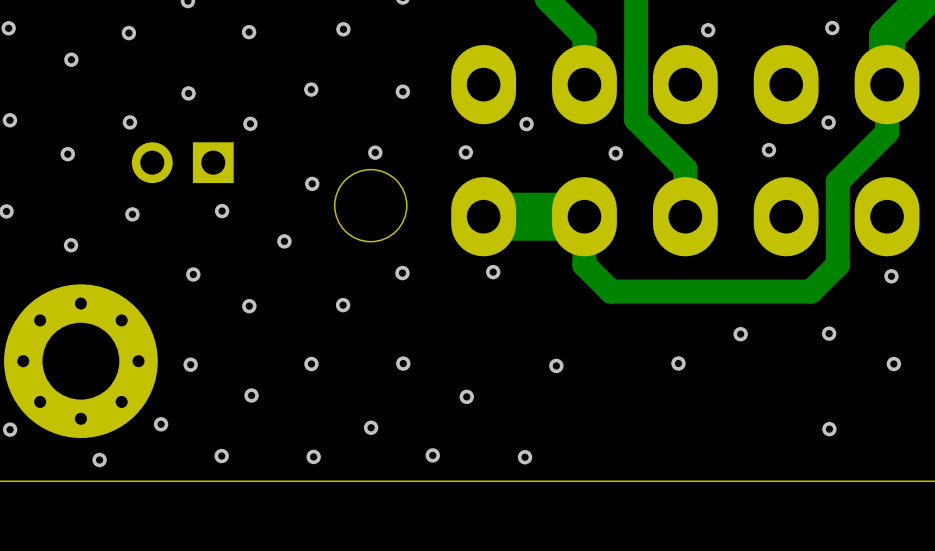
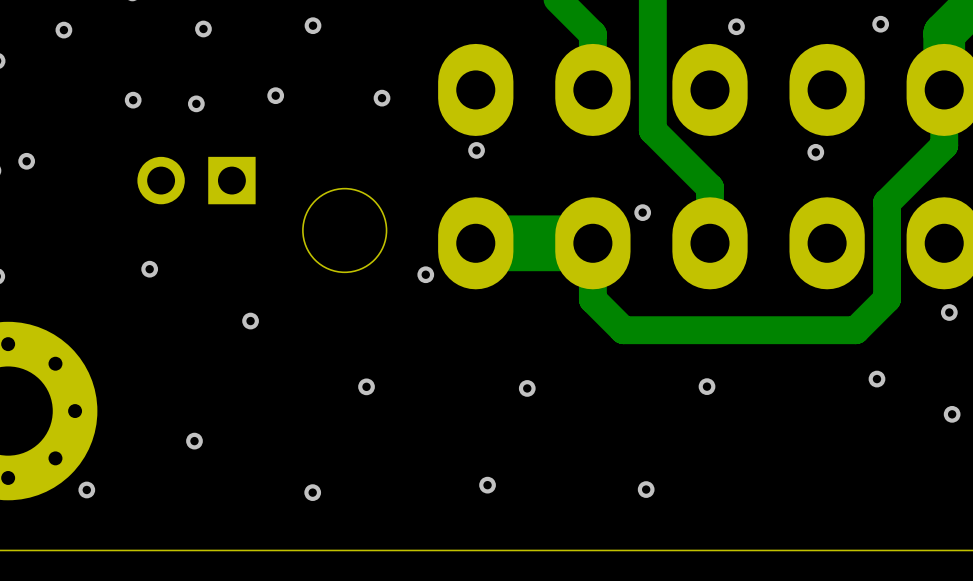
via: (129, 122) -> none
via: (828, 122) -> none
via position: (250, 123) -> (196, 103)
via: (526, 124) -> none
via: none -> (476, 150)
via: none -> (26, 161)
via position: (768, 150) -> (815, 152)
via: (375, 152) -> none
via: (465, 152) -> none
via position: (615, 153) -> (642, 212)
part position: (182, 162) -> (196, 180)
via: (312, 183) -> none
via: (222, 211) -> none
via: (132, 214) -> none
via: none -> (149, 269)
via: (284, 241) -> none
via: none -> (425, 274)
via: (493, 272) -> none
via: (402, 273) -> none
via: (193, 274) -> none
via: none -> (250, 321)
via: (343, 305) -> none
via: (249, 306) -> none
via: (740, 334) -> none
via position: (403, 363) -> (366, 386)
via position: (678, 363) -> (707, 386)
via: (190, 364) -> none
via: (311, 364) -> none
via position: (556, 365) -> (527, 388)
via position: (251, 395) -> (194, 441)
via: (466, 396) -> none
via position: (161, 424) -> (86, 489)
via: none -> (487, 485)
via: (371, 427) -> none
via: none -> (646, 489)
via: (829, 429) -> none
via: none -> (312, 492)
via: (432, 455) -> none
via: (221, 456) -> none
via: (313, 456) -> none
via: (525, 457) -> none
via: (99, 460) -> none

